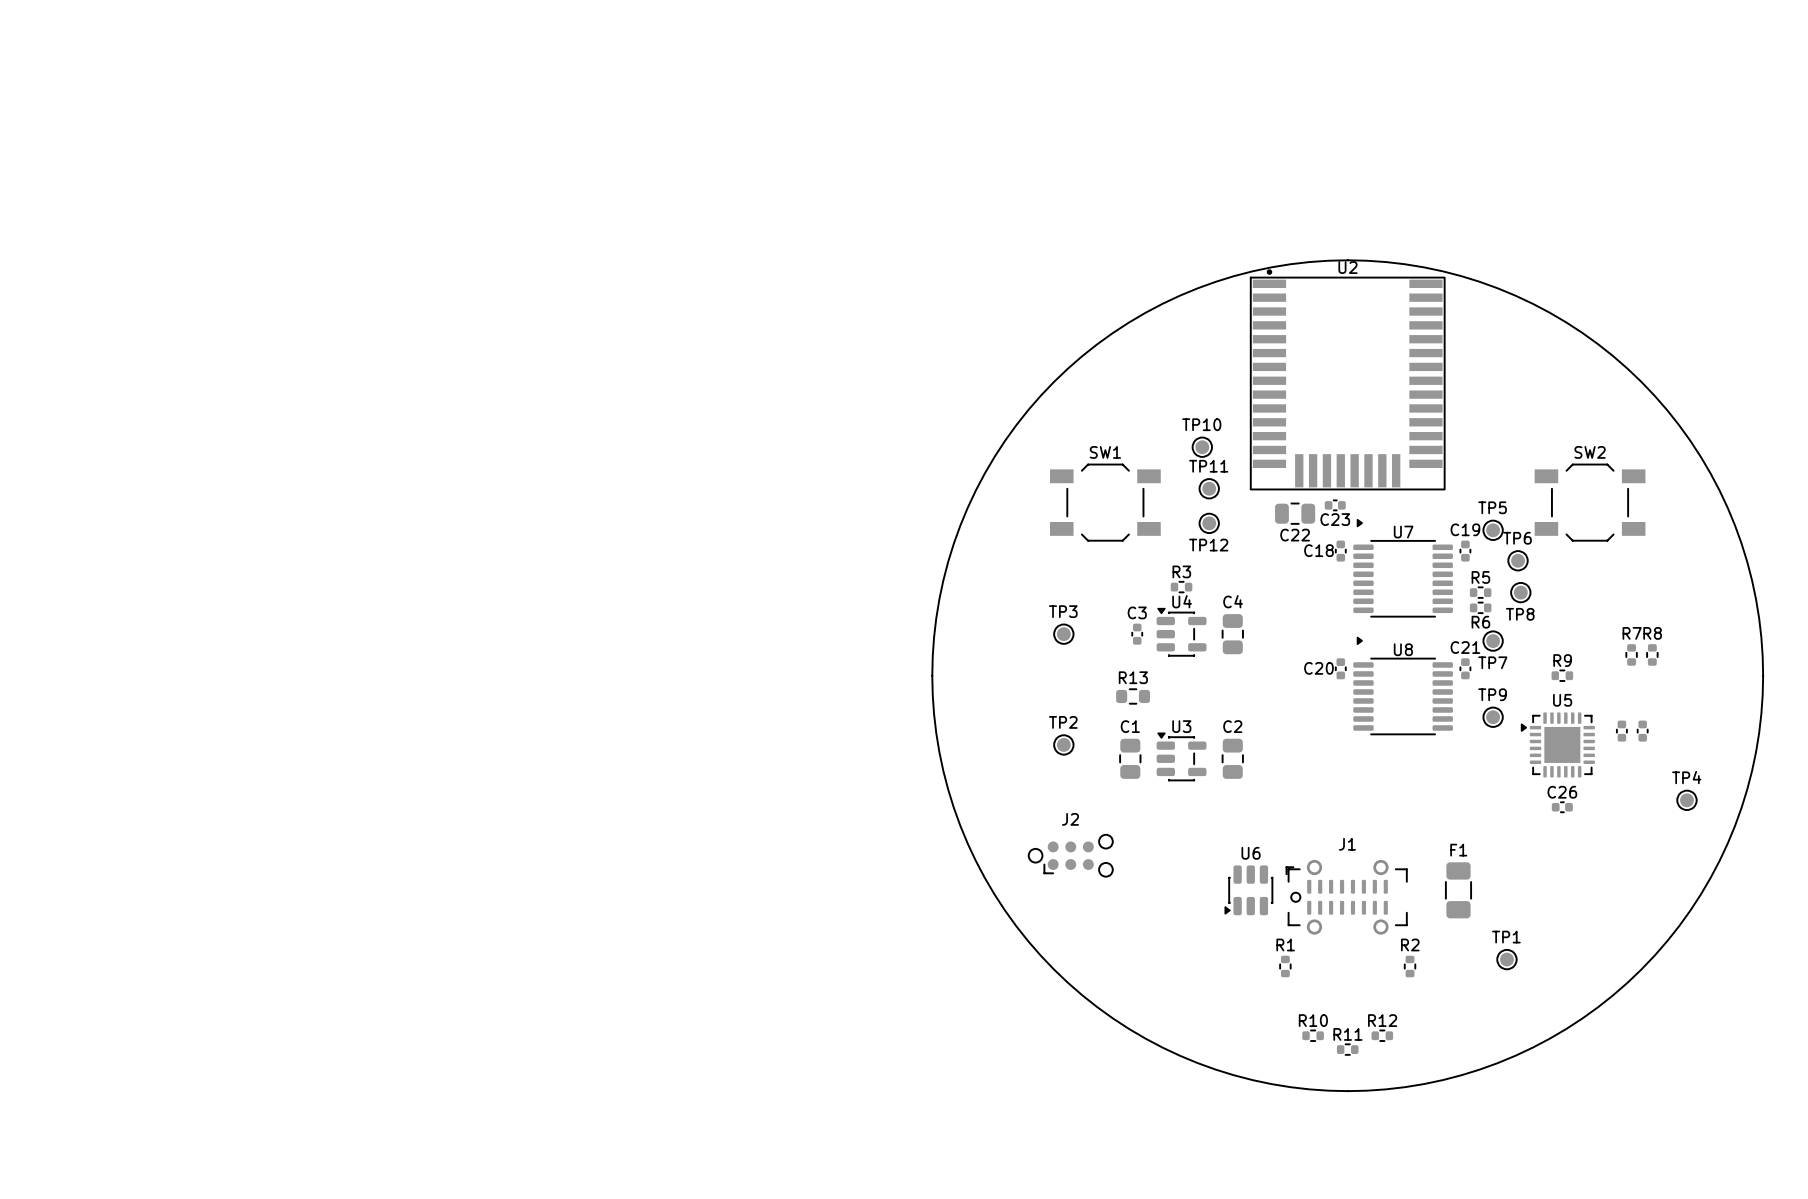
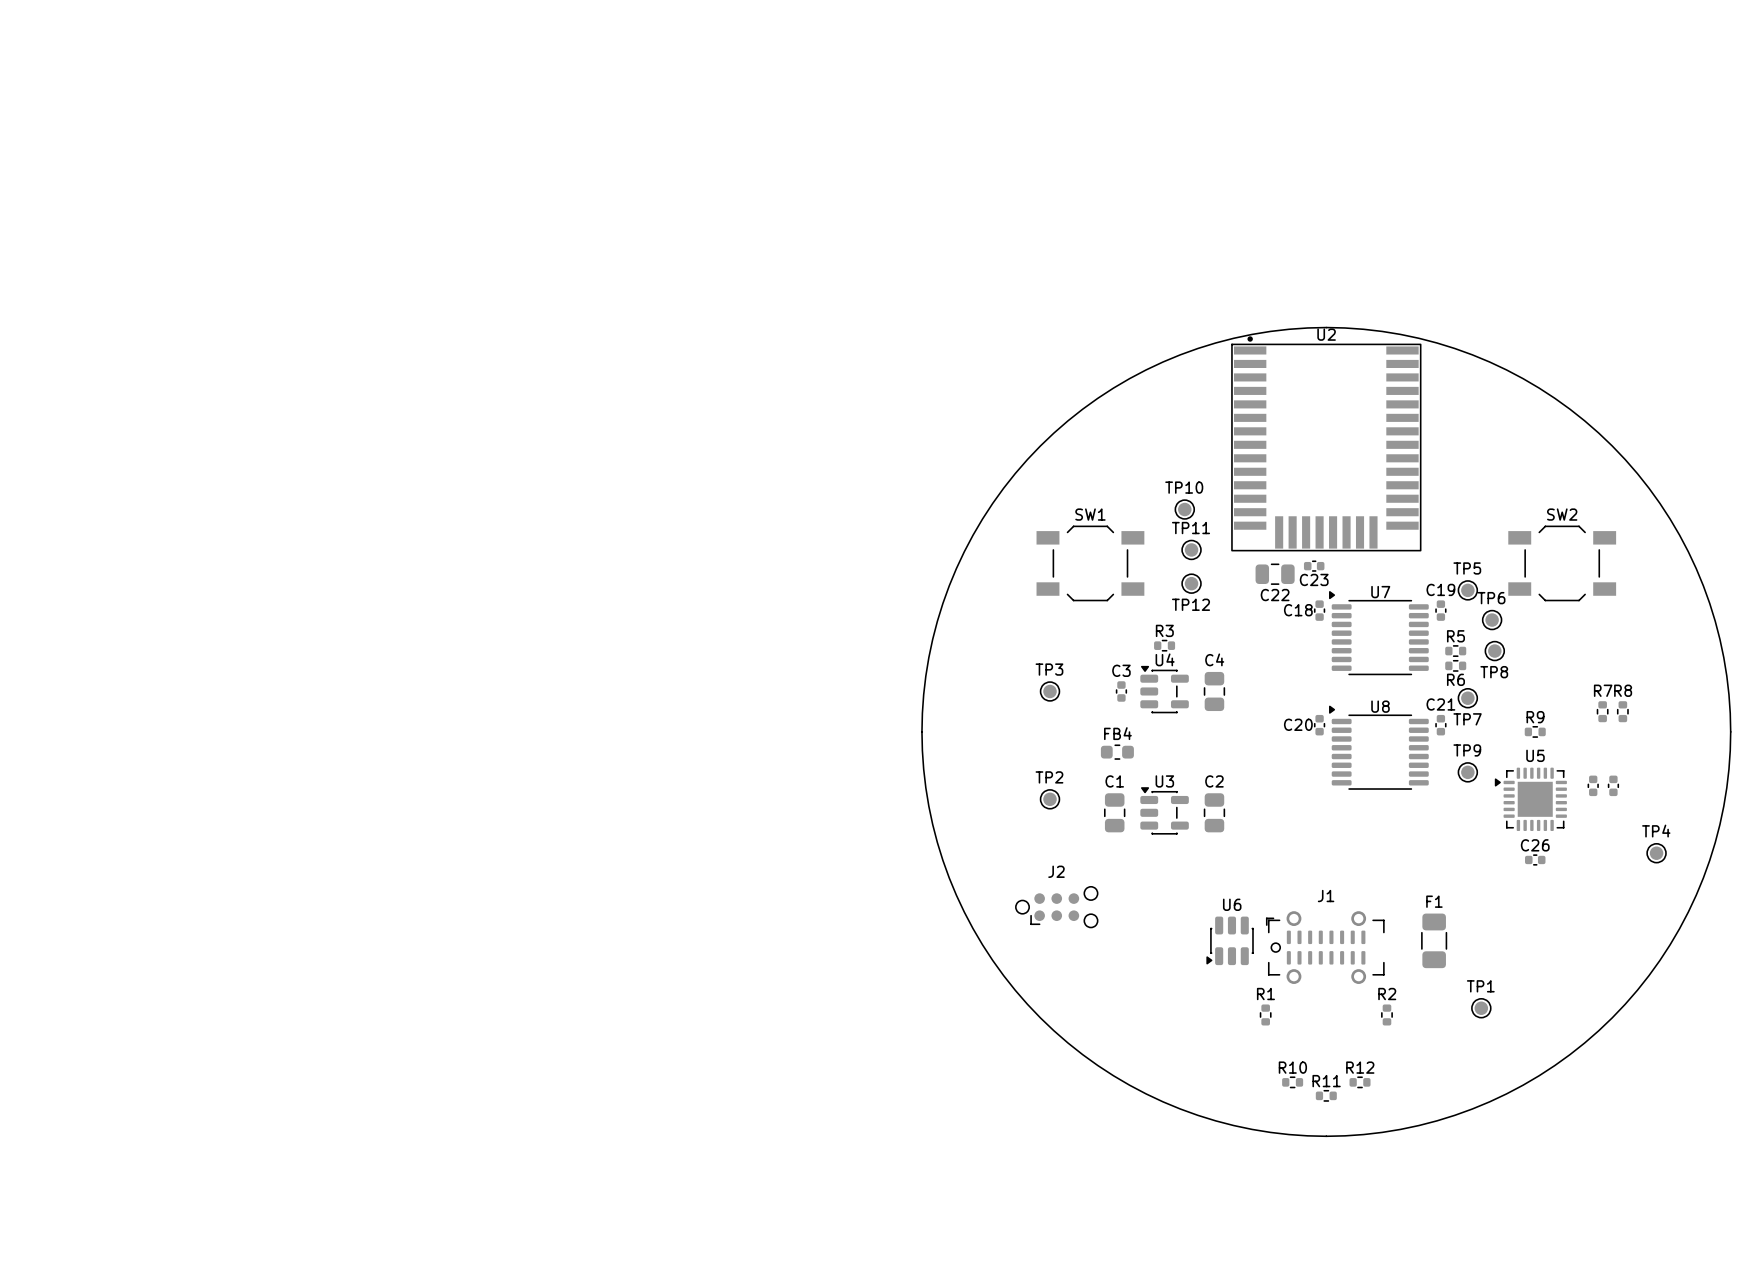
U7 footprint: [1353, 518, 1453, 618] -> [1329, 591, 1429, 676]
U8 footprint: [1353, 636, 1453, 736] -> [1329, 705, 1429, 790]
R13: (1133, 696) -> none
FB4: none -> (1117, 752)

